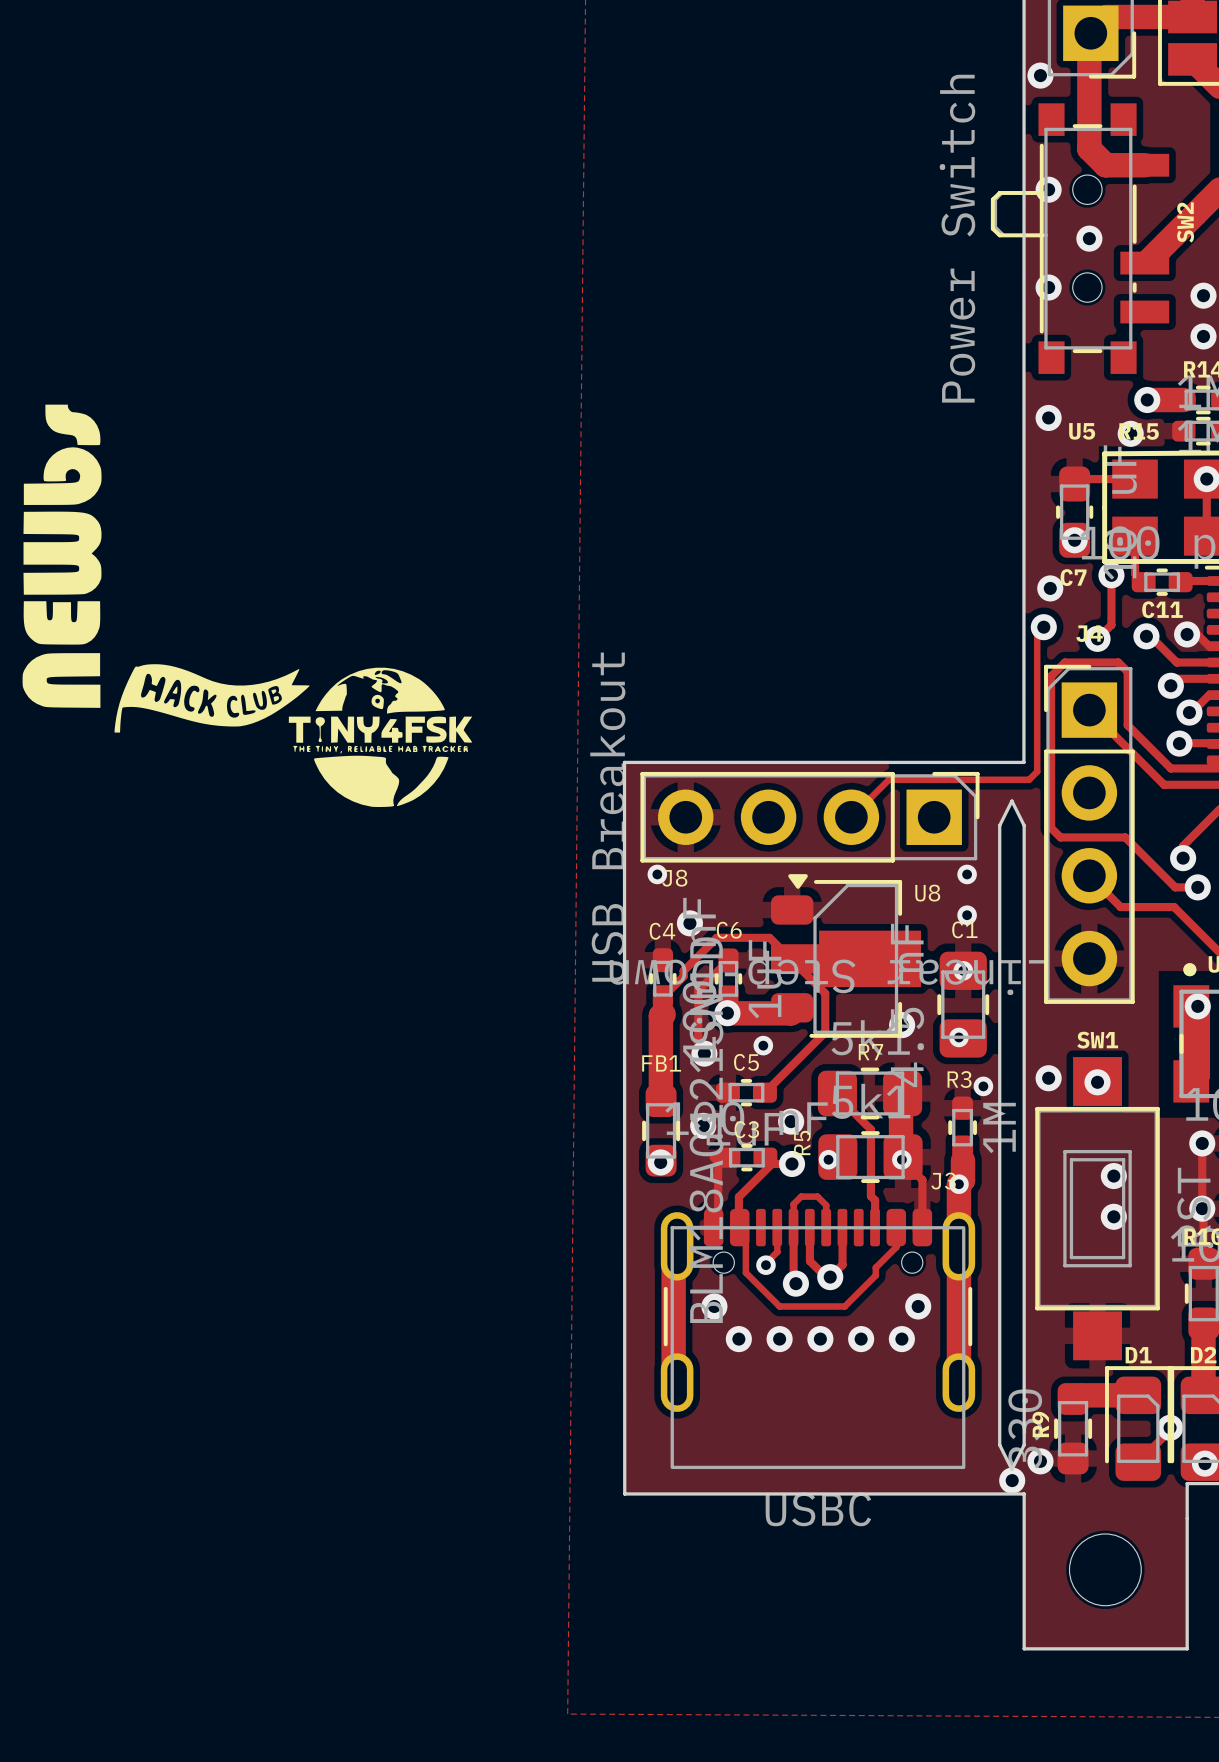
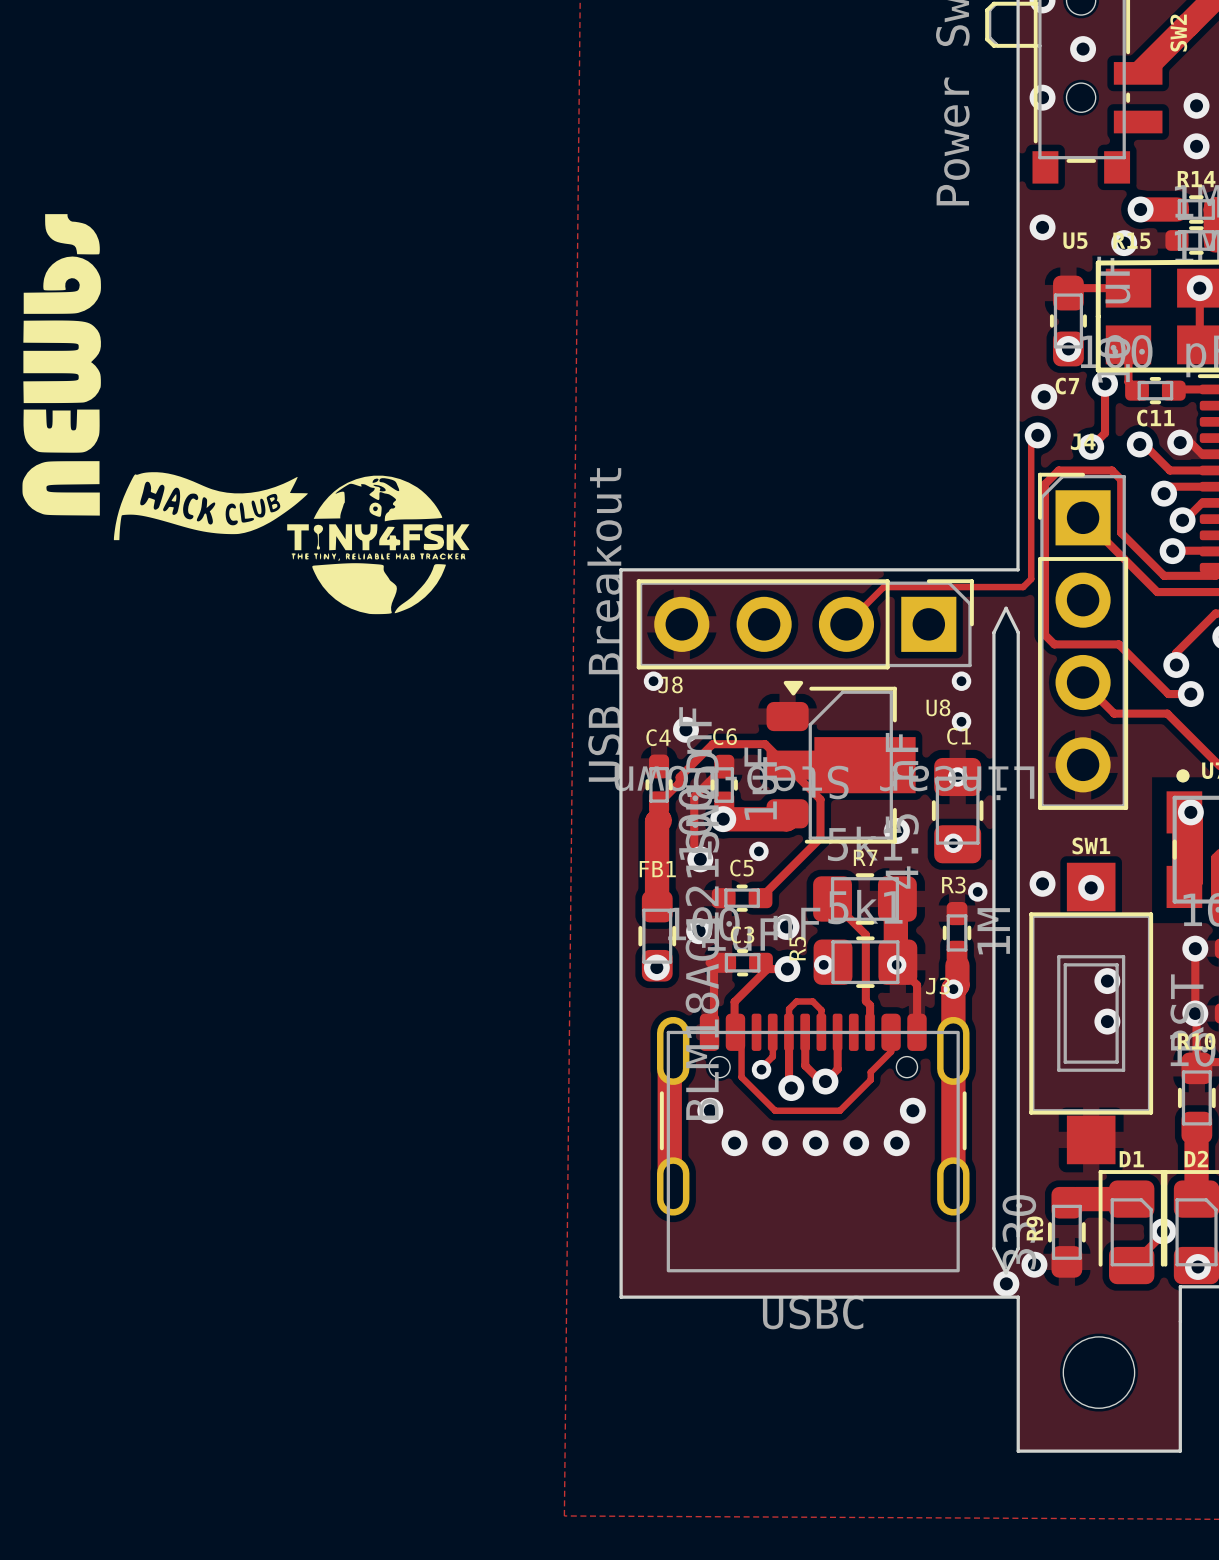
U8 name position: U8 (927, 893) -> U8 (938, 707)

